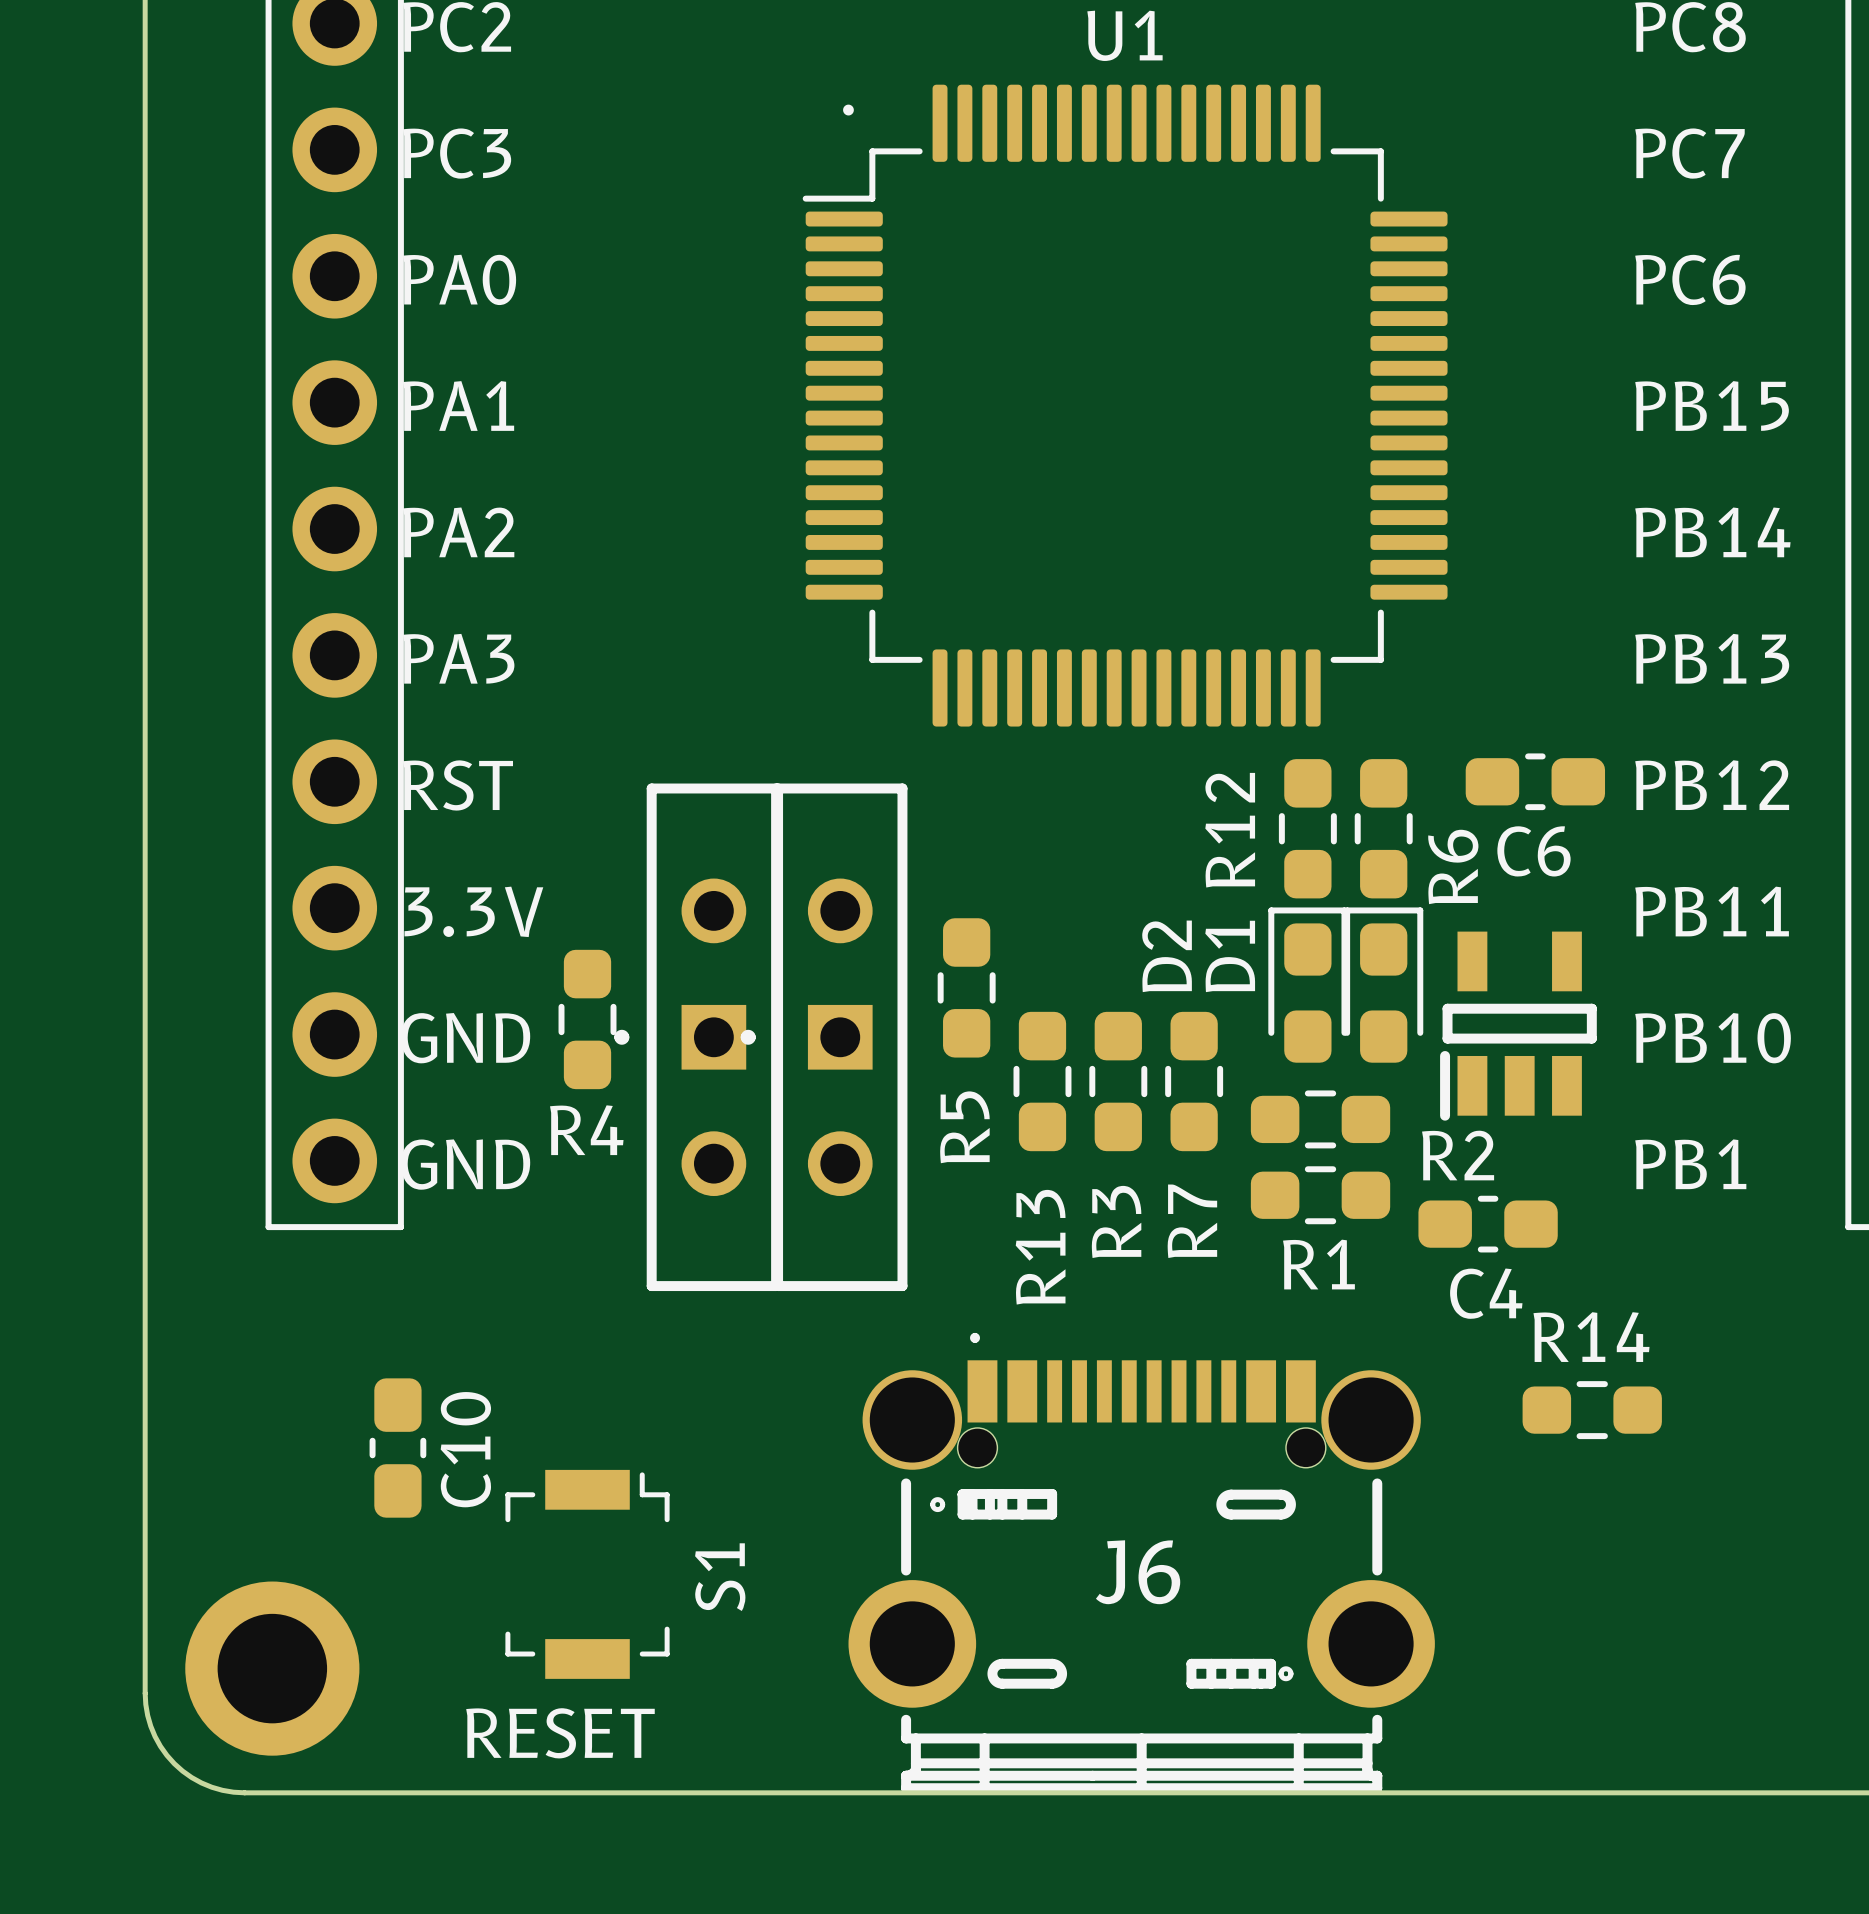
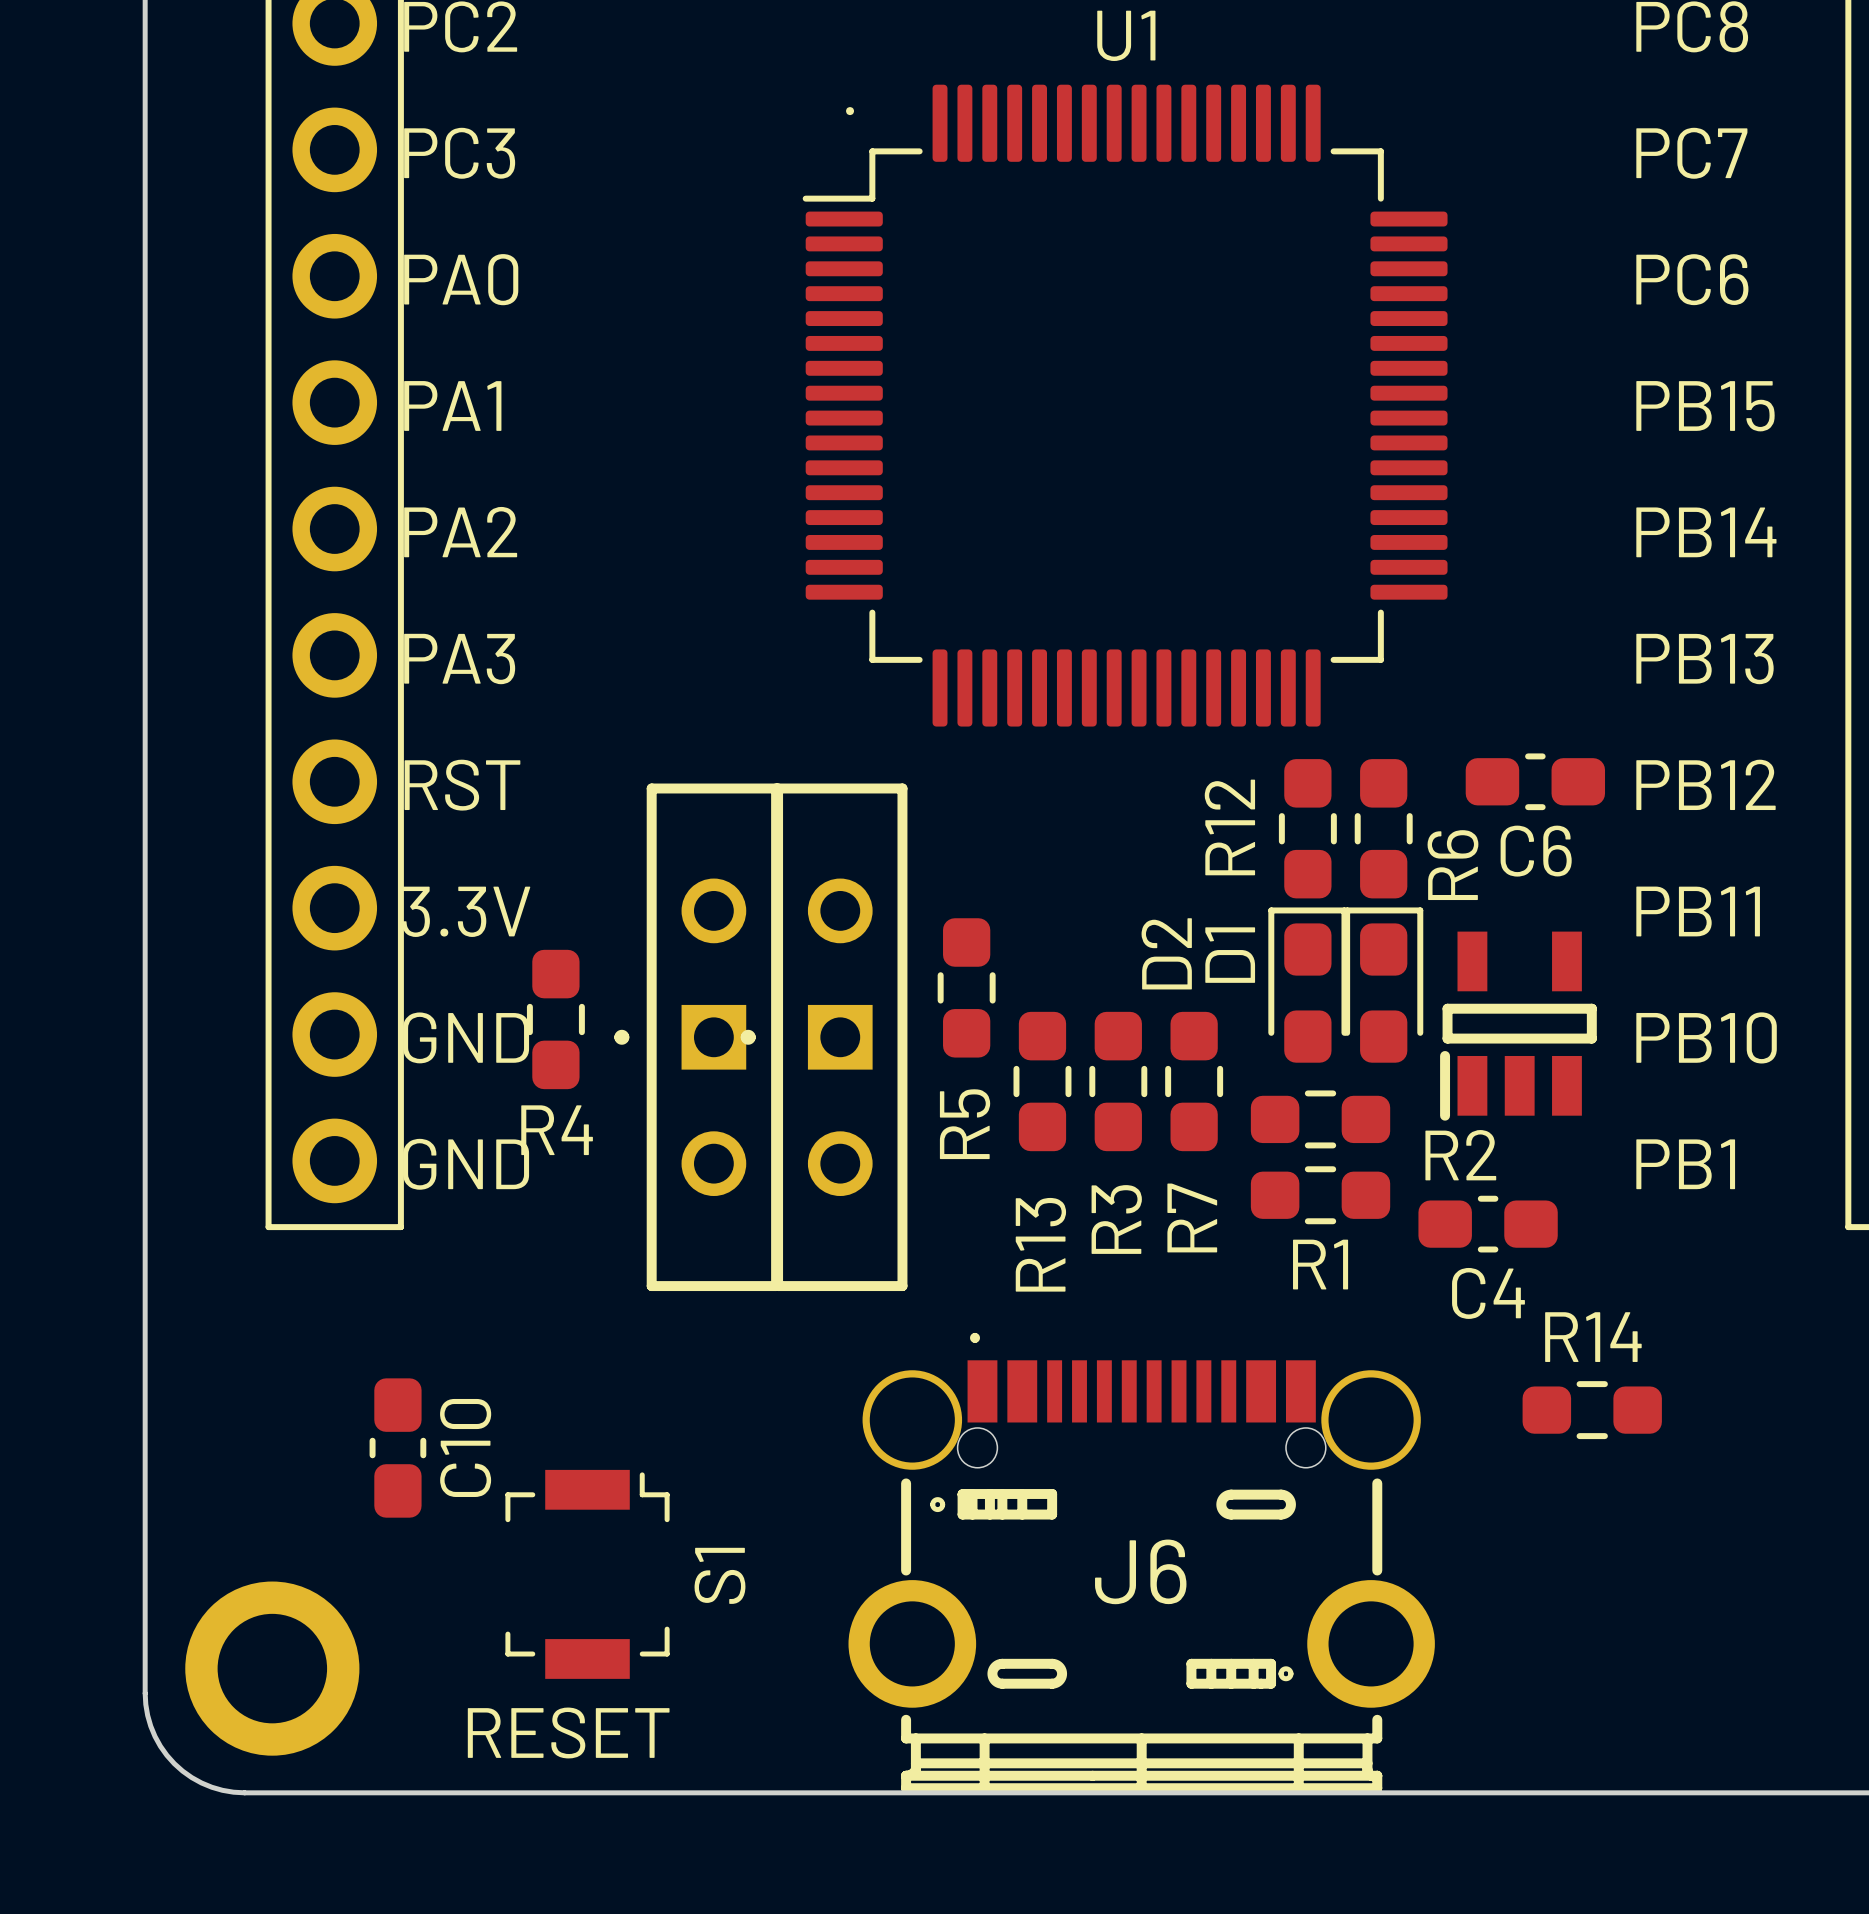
R4 position: (587, 1019) -> (555, 1019)

